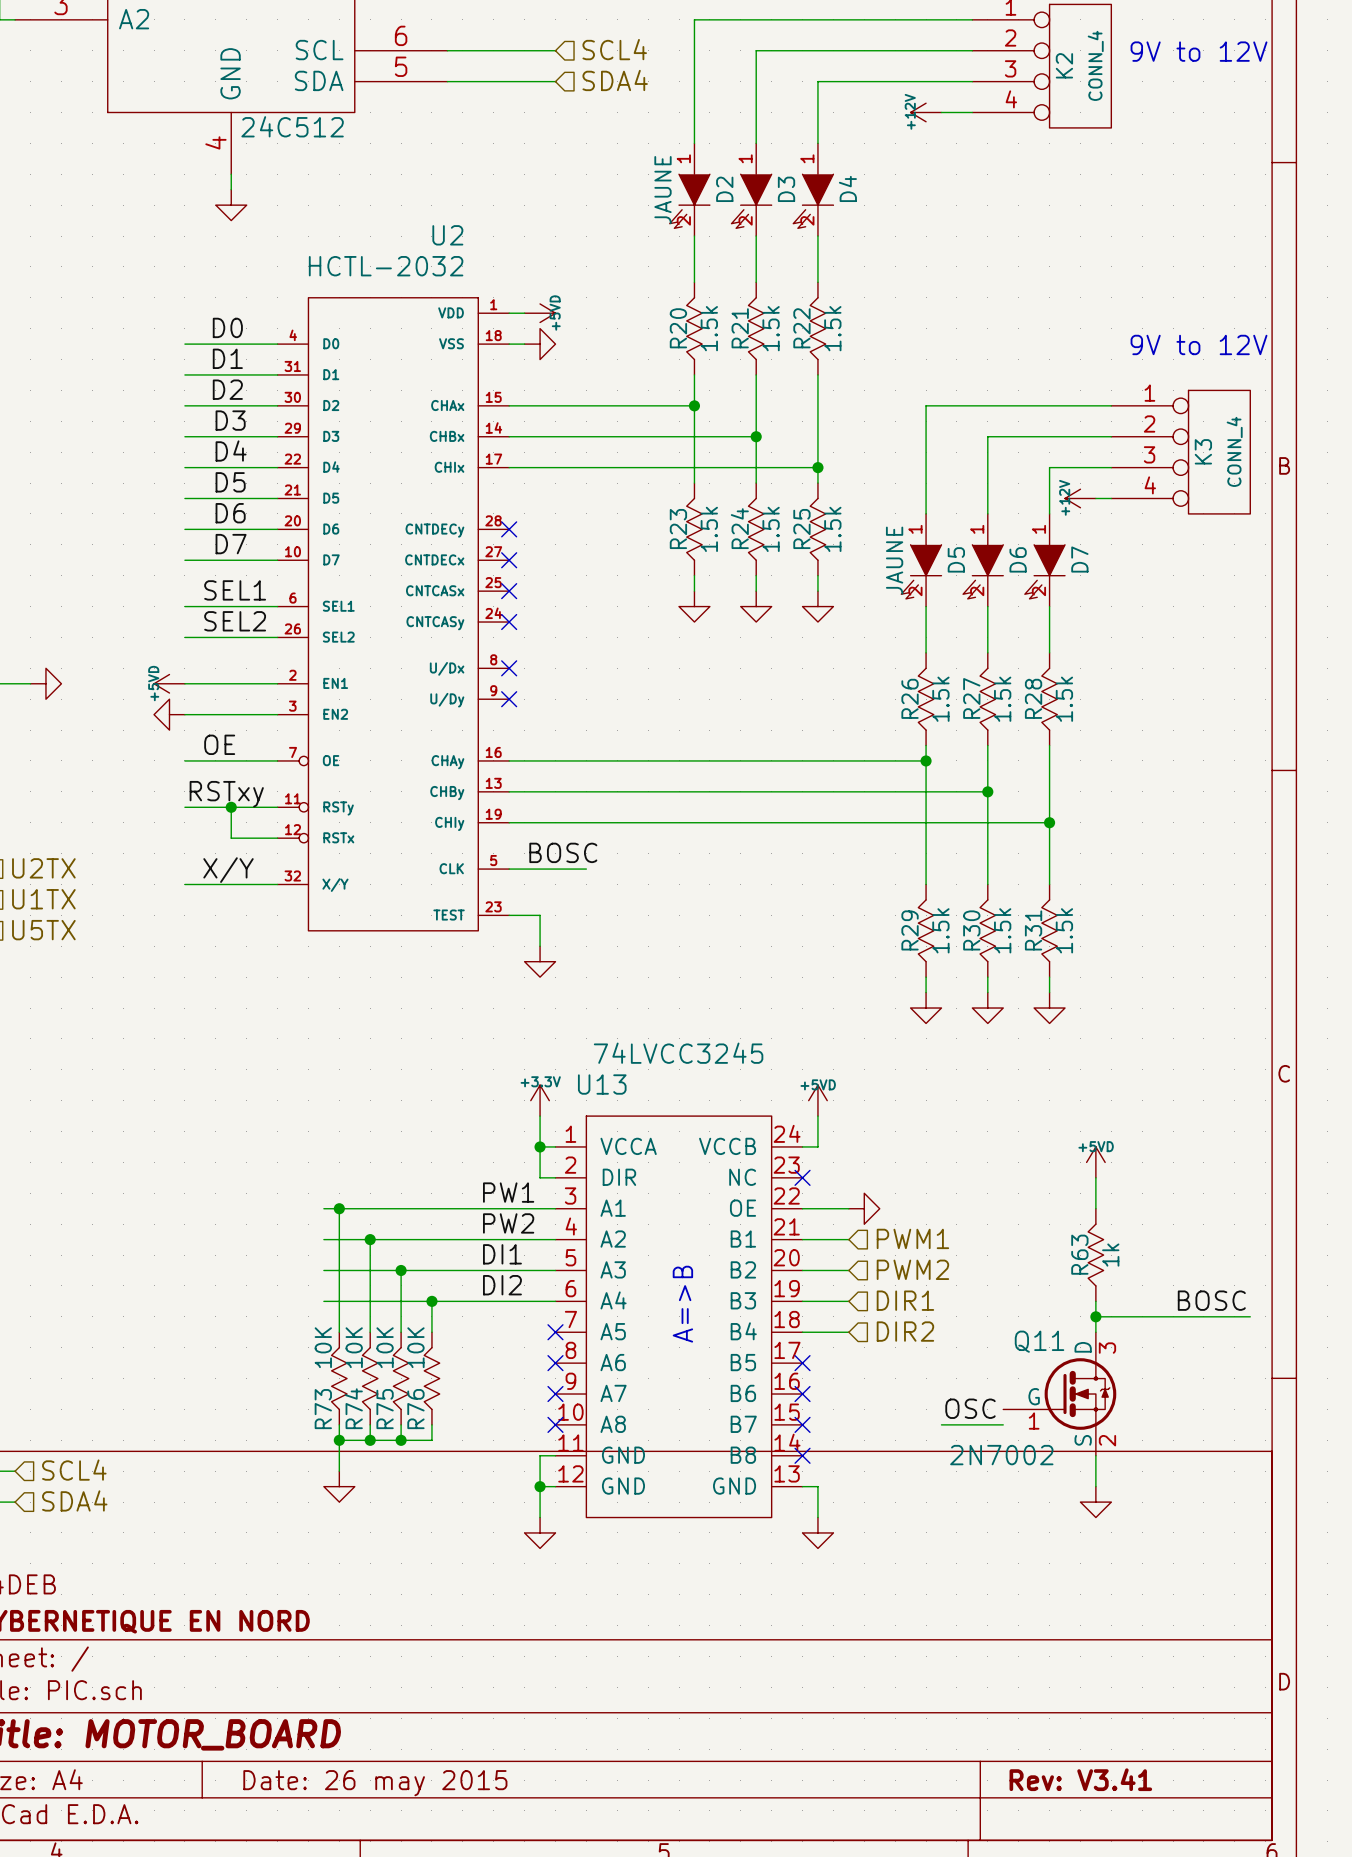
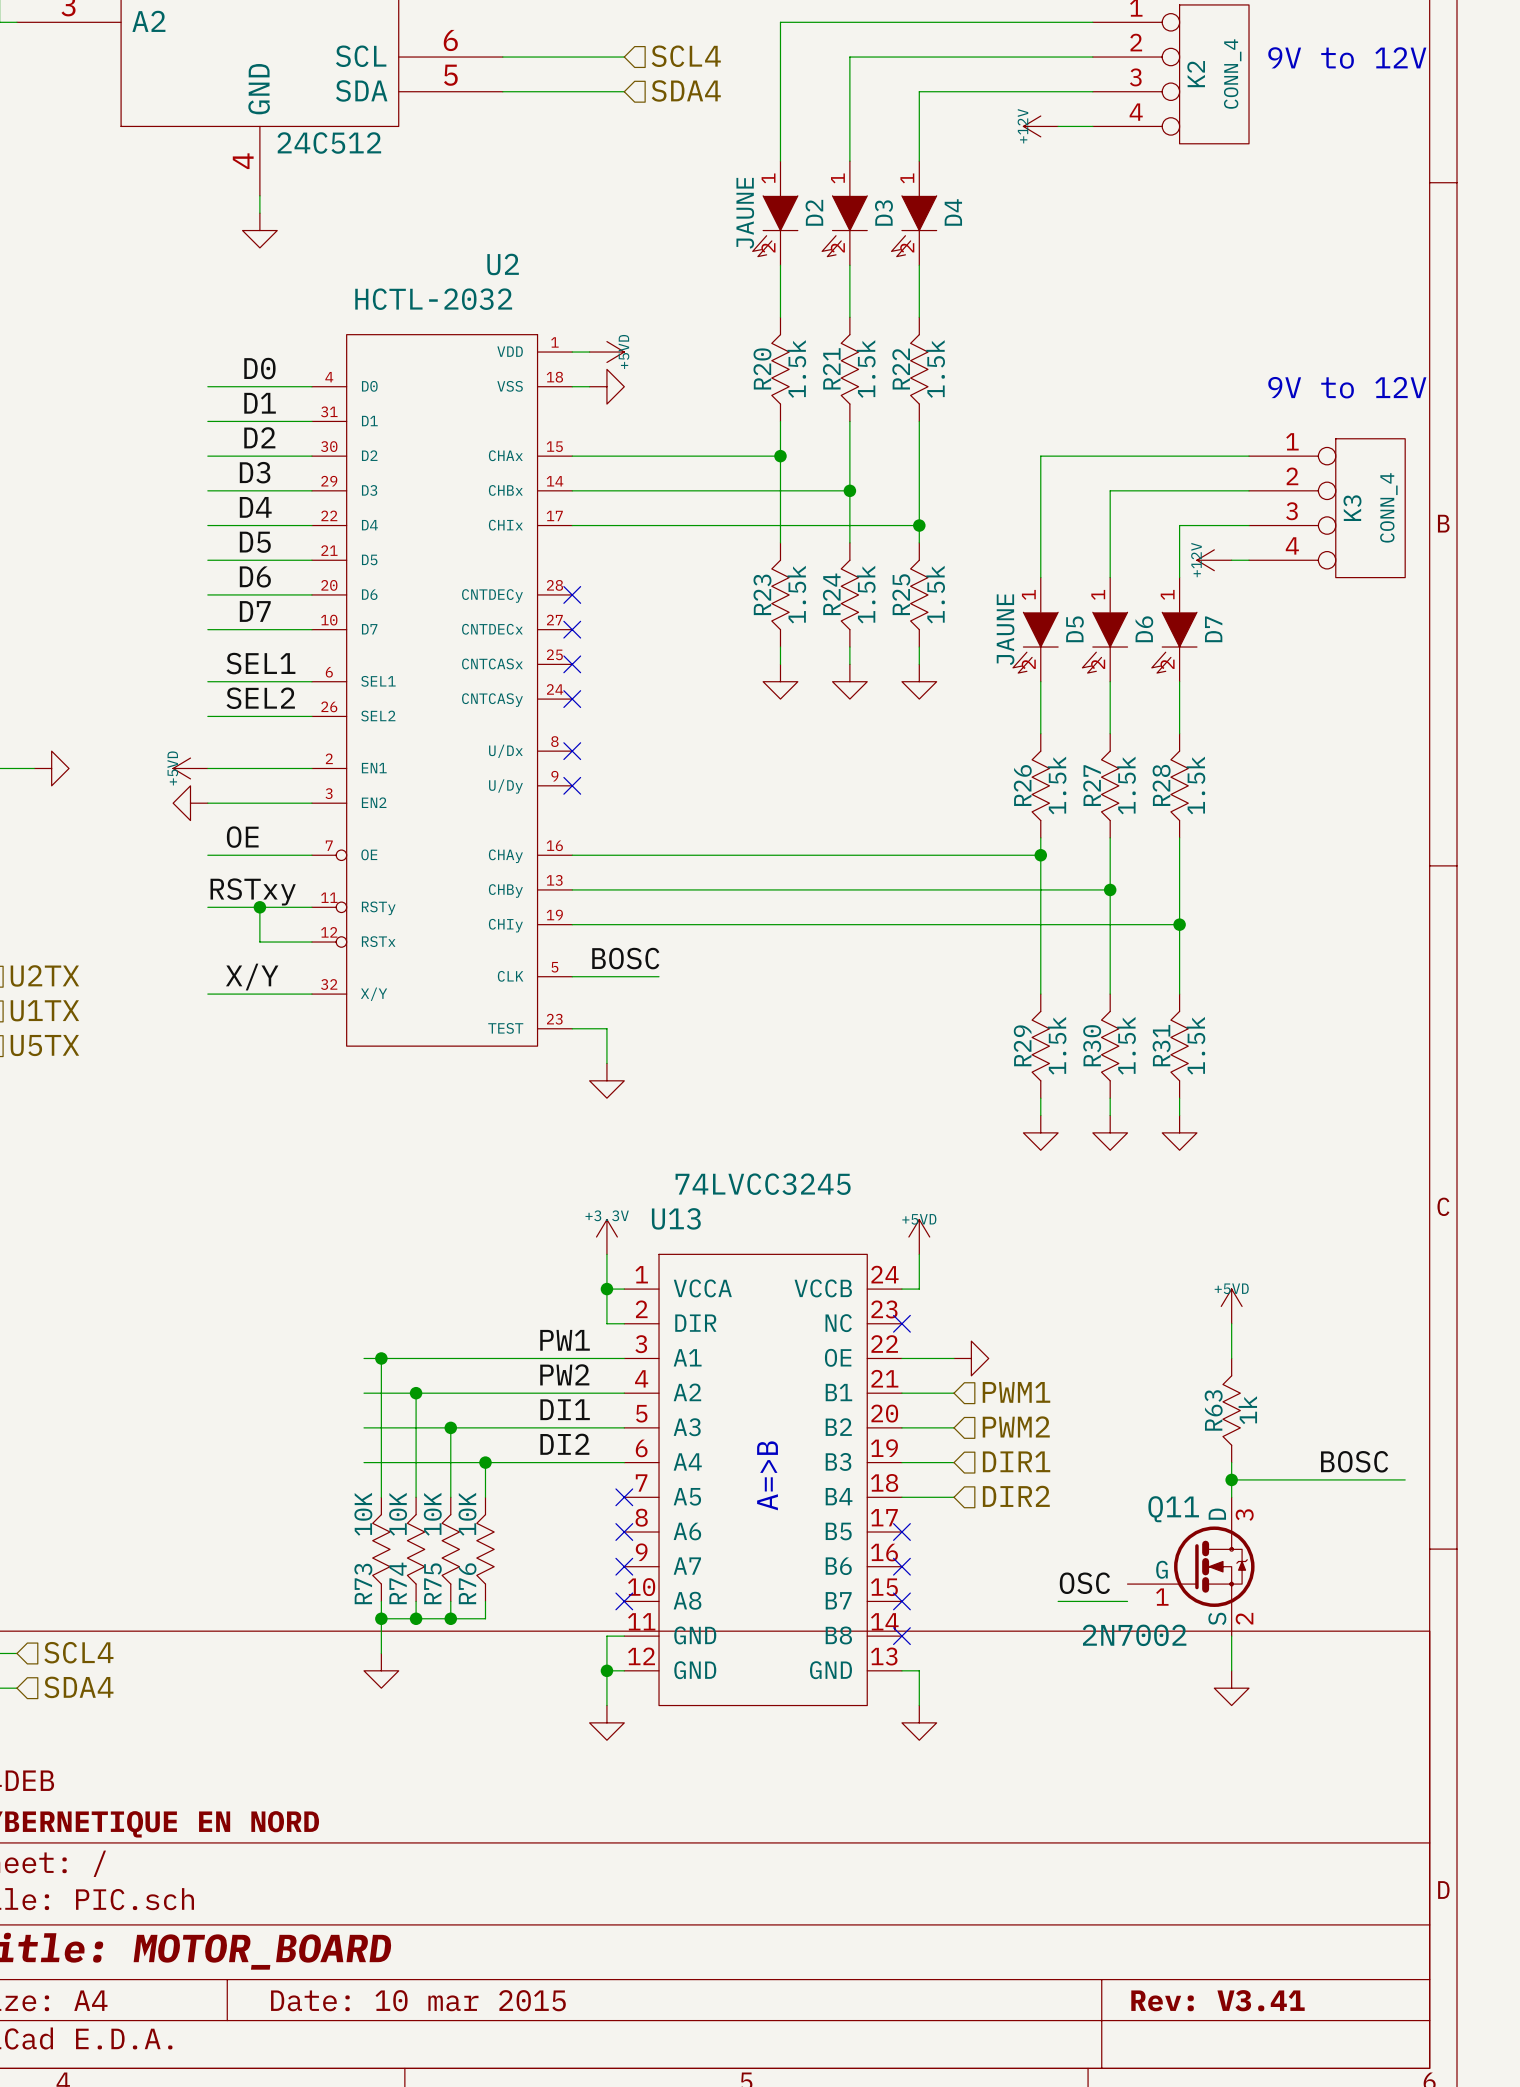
title block: Date: 26 may 2015 (375, 1783) -> Date: 10 mar 2015 (418, 2000)

